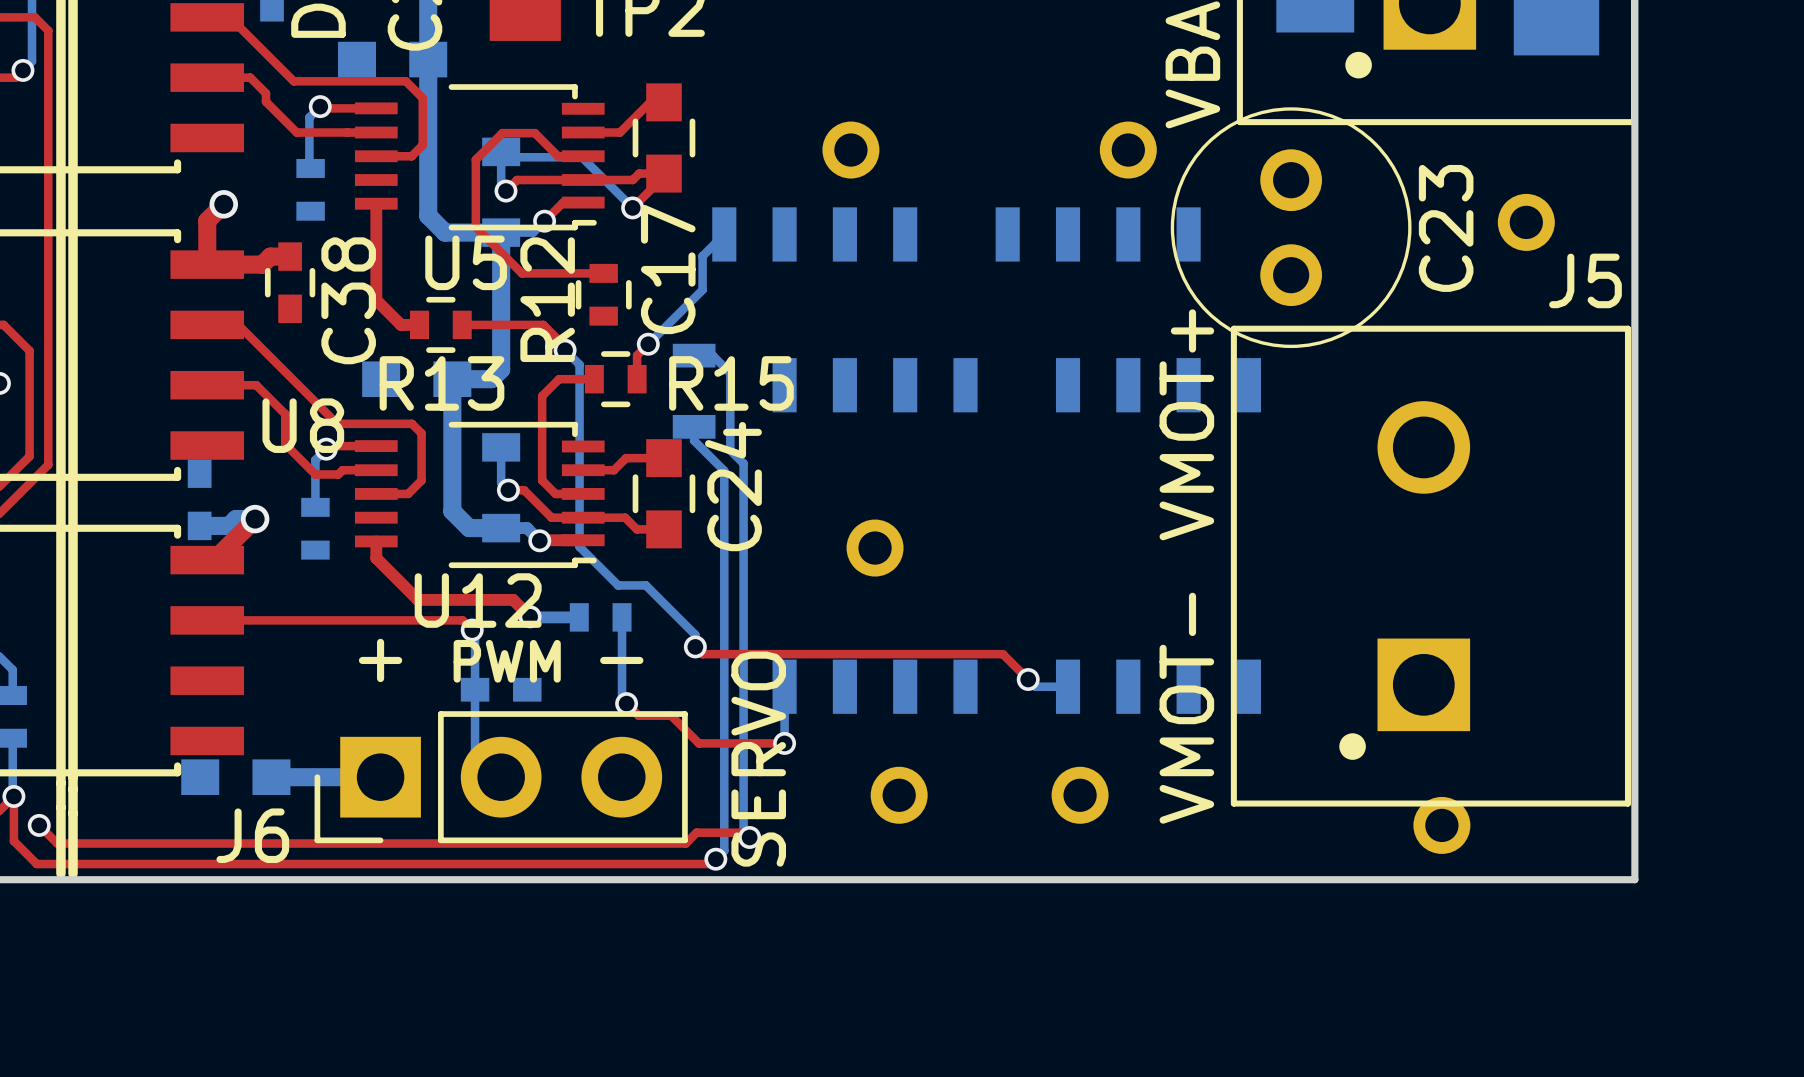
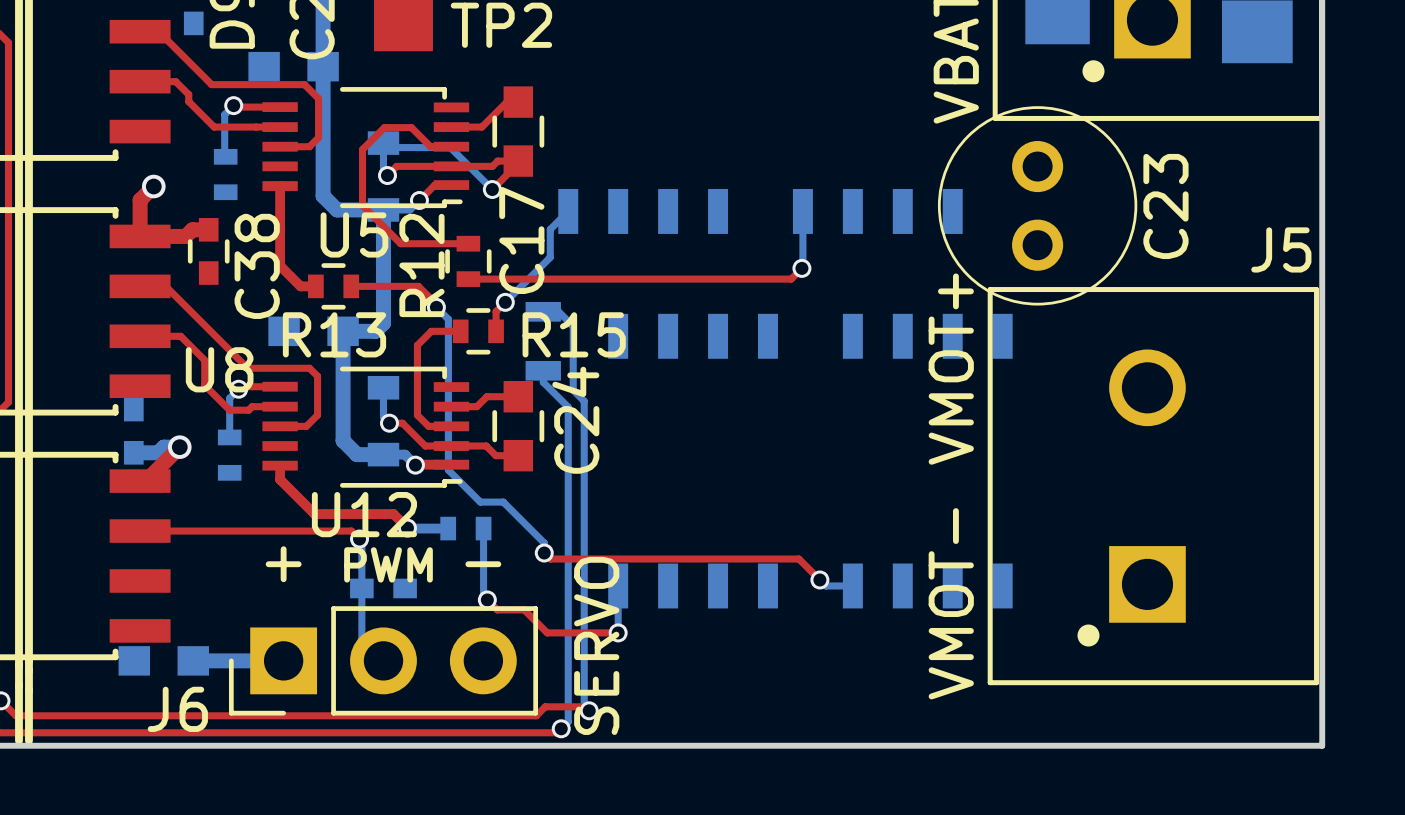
part: (850, 150) -> none
part: (1128, 150) -> none
part: (1526, 222) -> none
bottom track: none -> (802, 211) (801, 268)
top track: none -> (801, 268) (791, 279) (468, 279)
via: none -> (801, 268)
part: (875, 548) -> none
part: (899, 795) -> none
part: (1080, 795) -> none
part: (1441, 825) -> none

